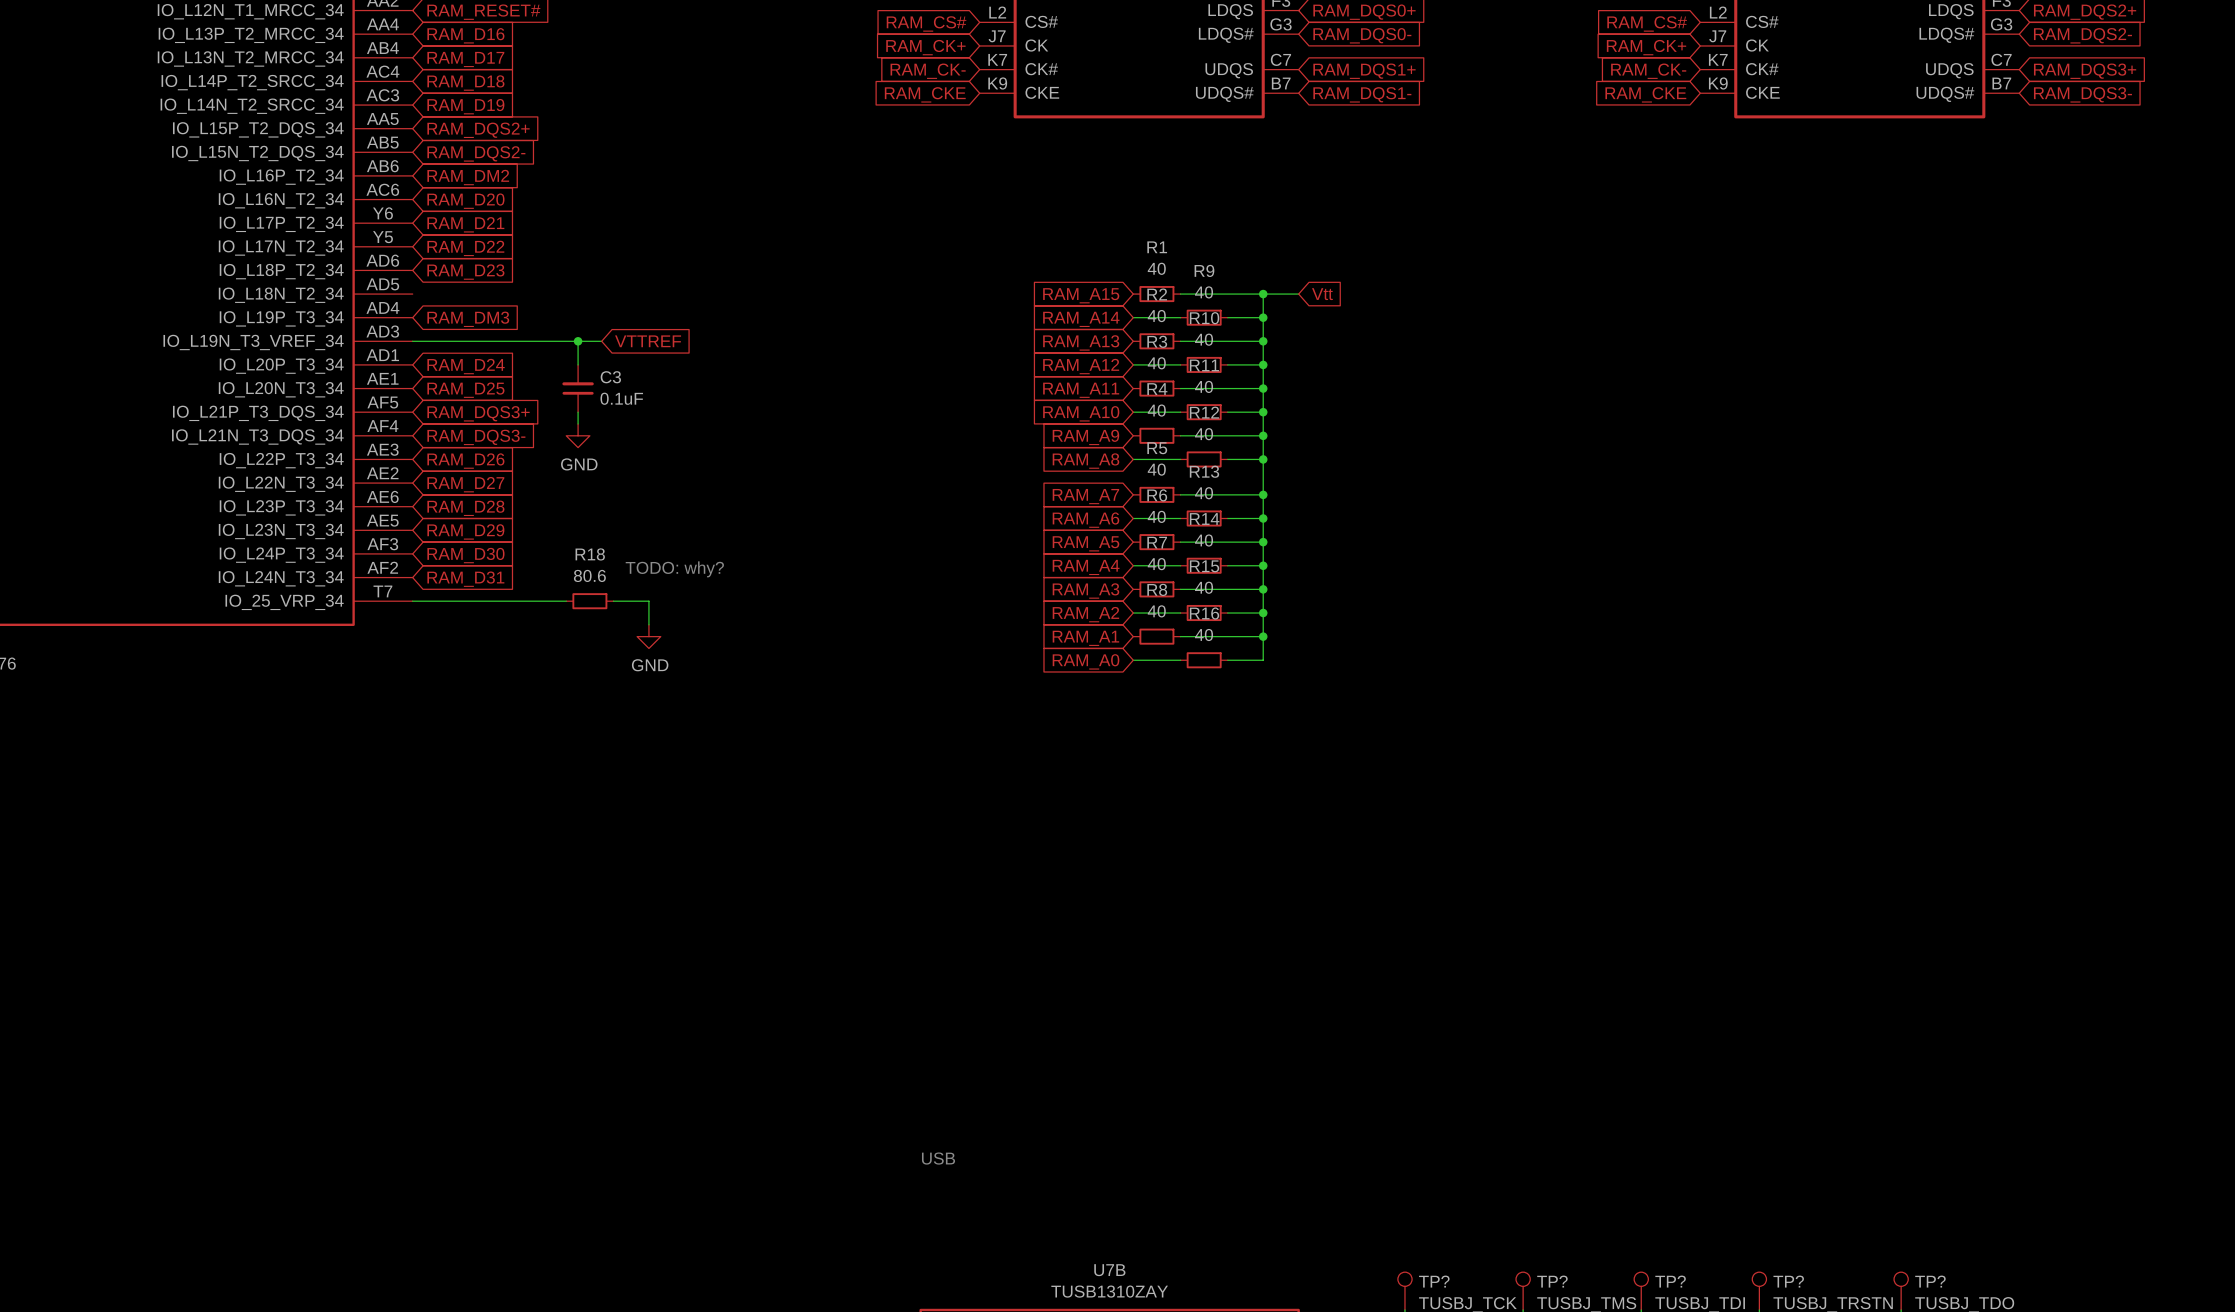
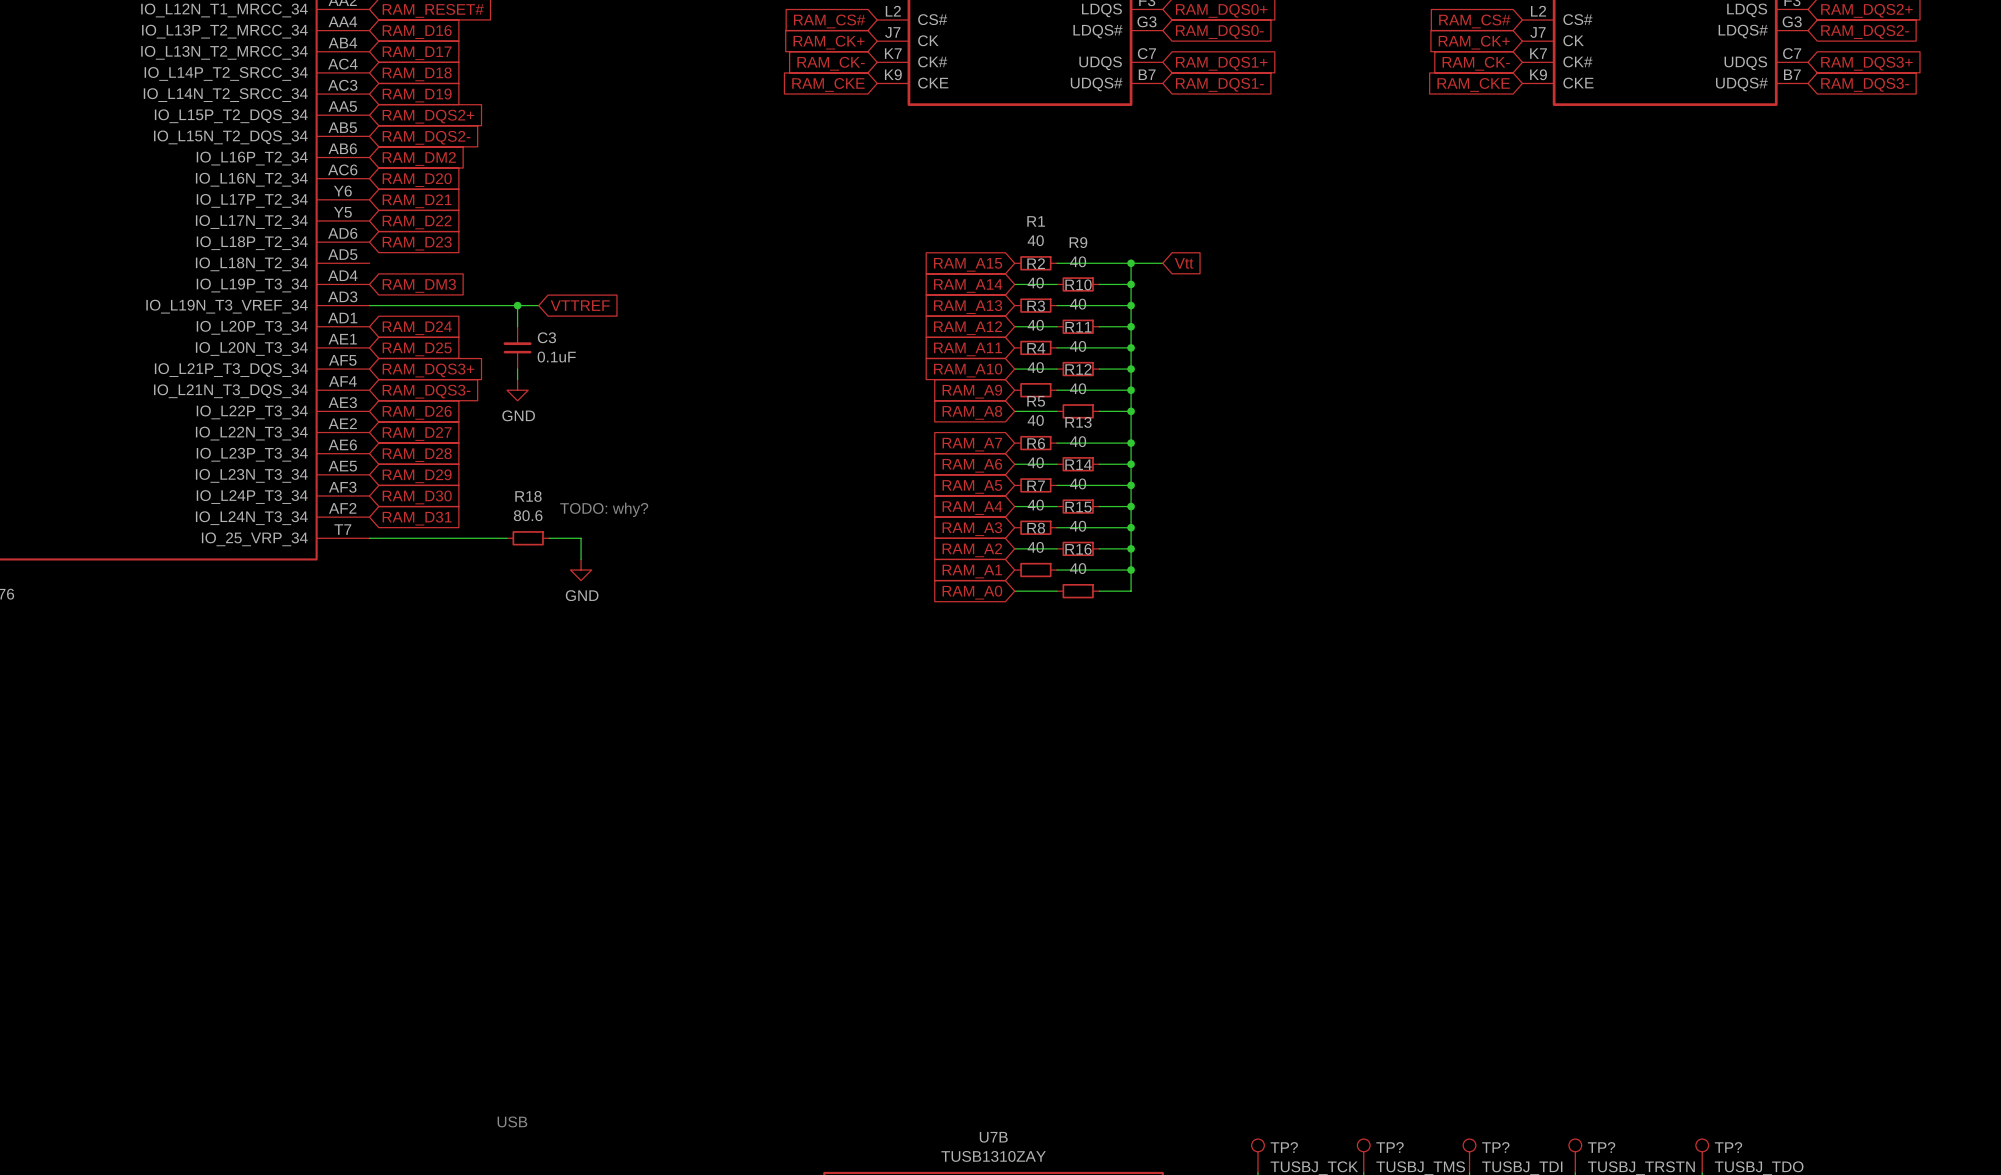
text: USB (938, 1158) -> none
text: none -> USB (512, 1121)

